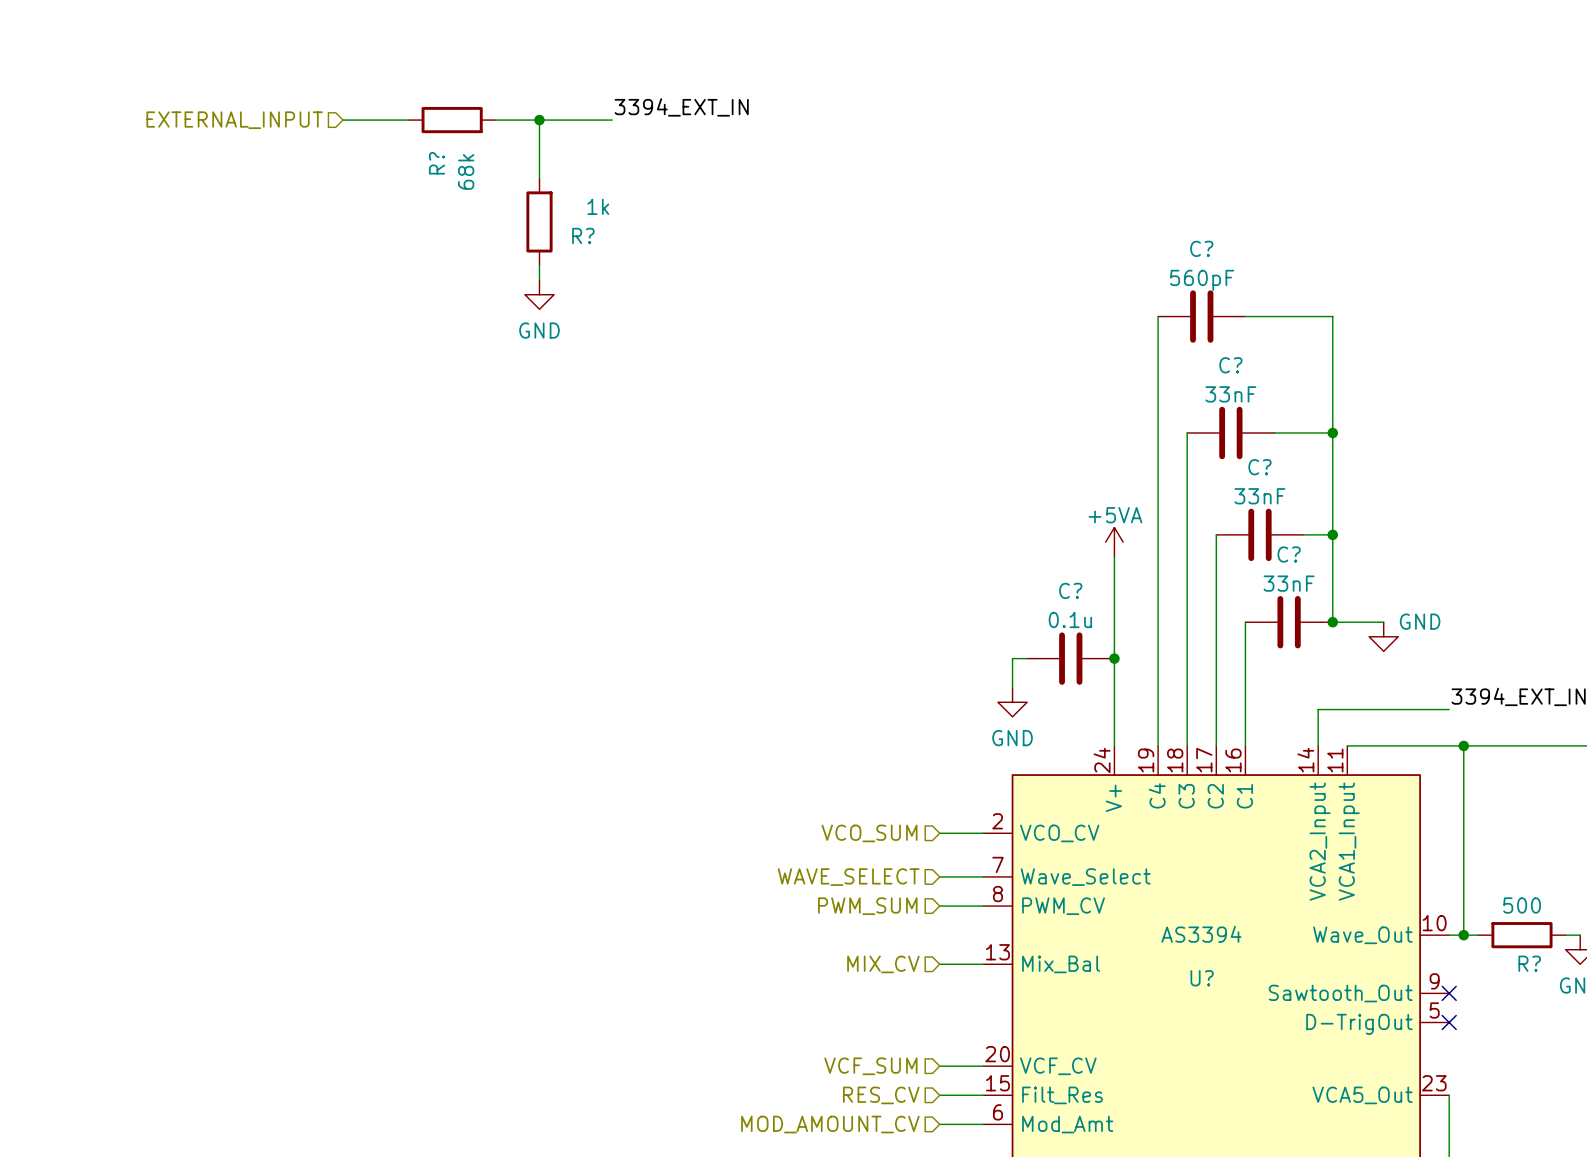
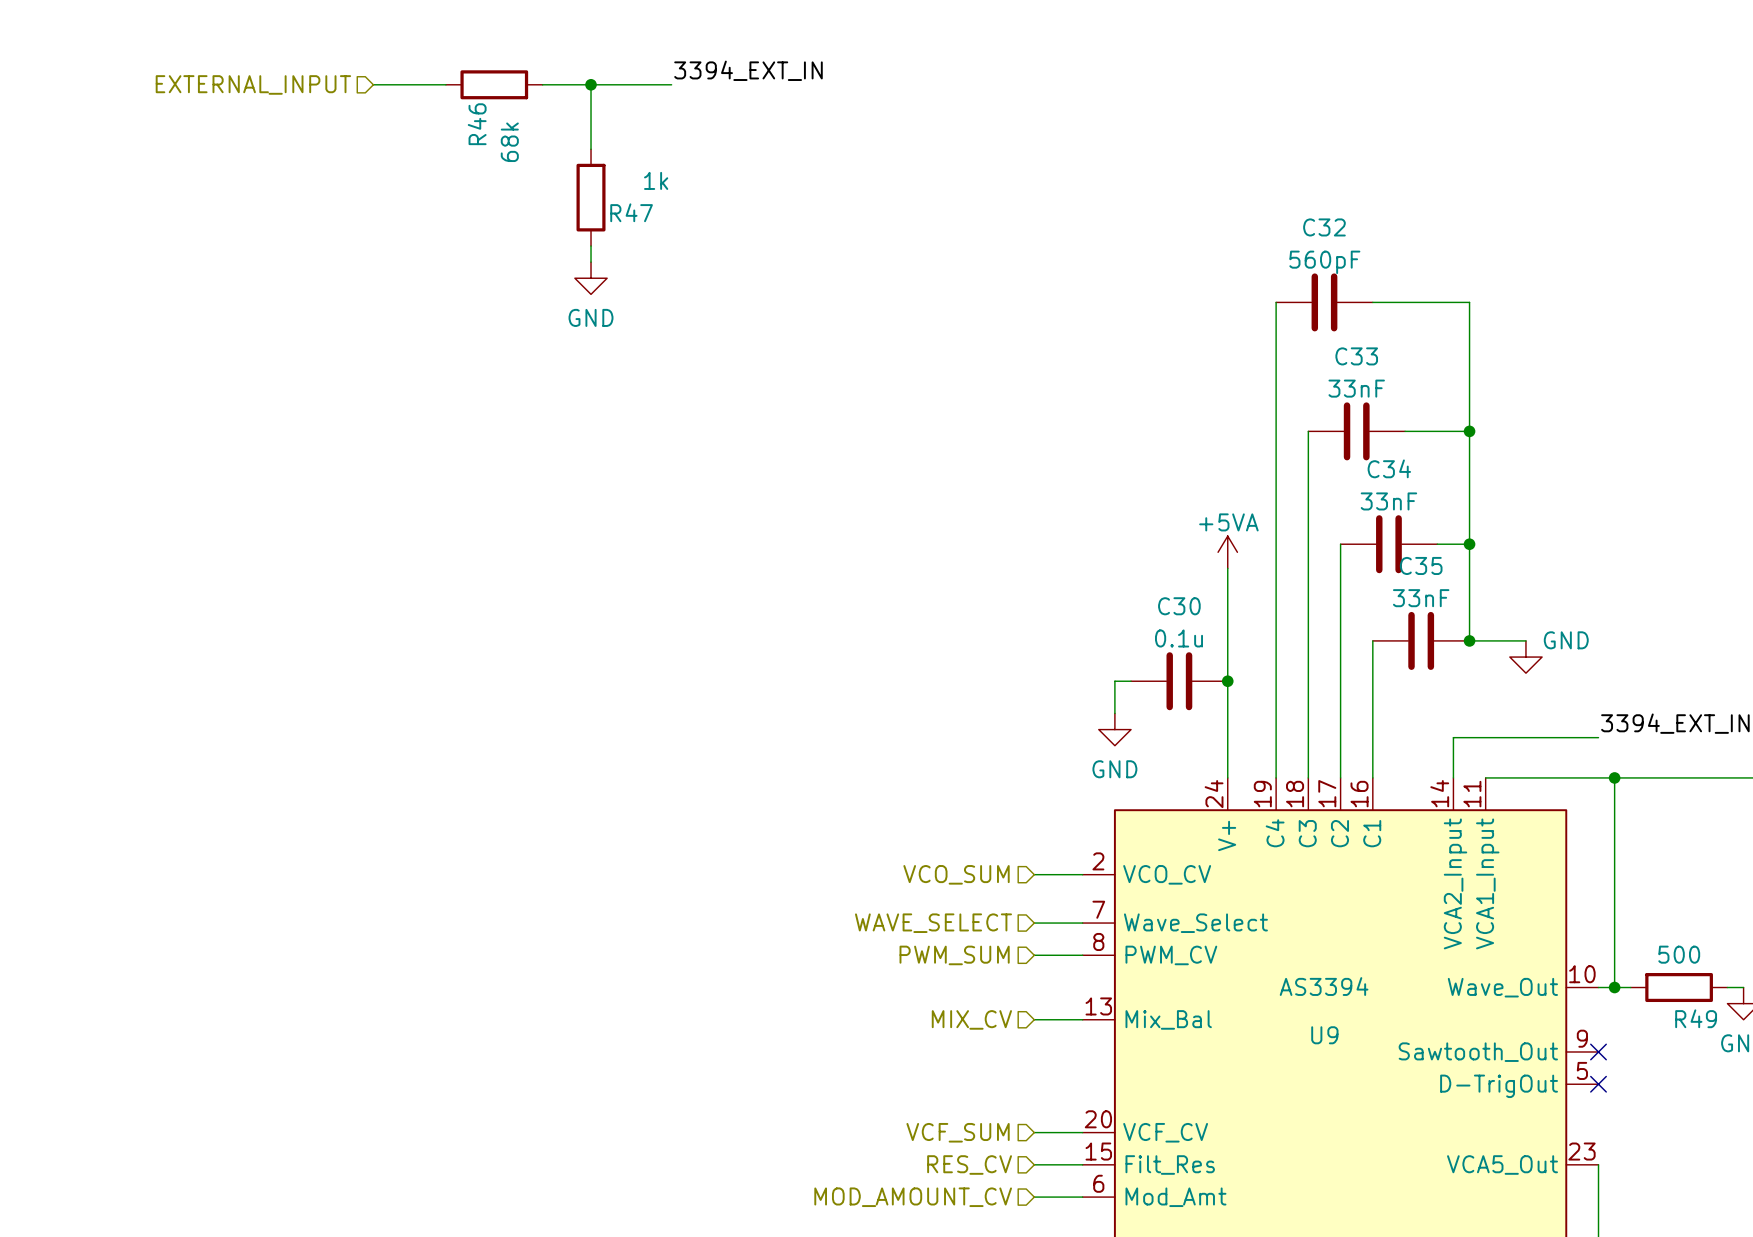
R? name: R? (437, 163) -> R46 (477, 124)
R? name: R? (583, 235) -> R47 (631, 212)
C? name: C? (1201, 248) -> C32 (1324, 227)
C? name: C? (1230, 365) -> C33 (1356, 356)
C? name: C? (1259, 467) -> C34 (1389, 468)
C? name: C? (1289, 554) -> C35 (1421, 565)
C? name: C? (1070, 590) -> C30 (1179, 606)
R? name: R? (1529, 963) -> R49 (1696, 1018)
U? name: U? (1202, 978) -> U9 (1324, 1035)

